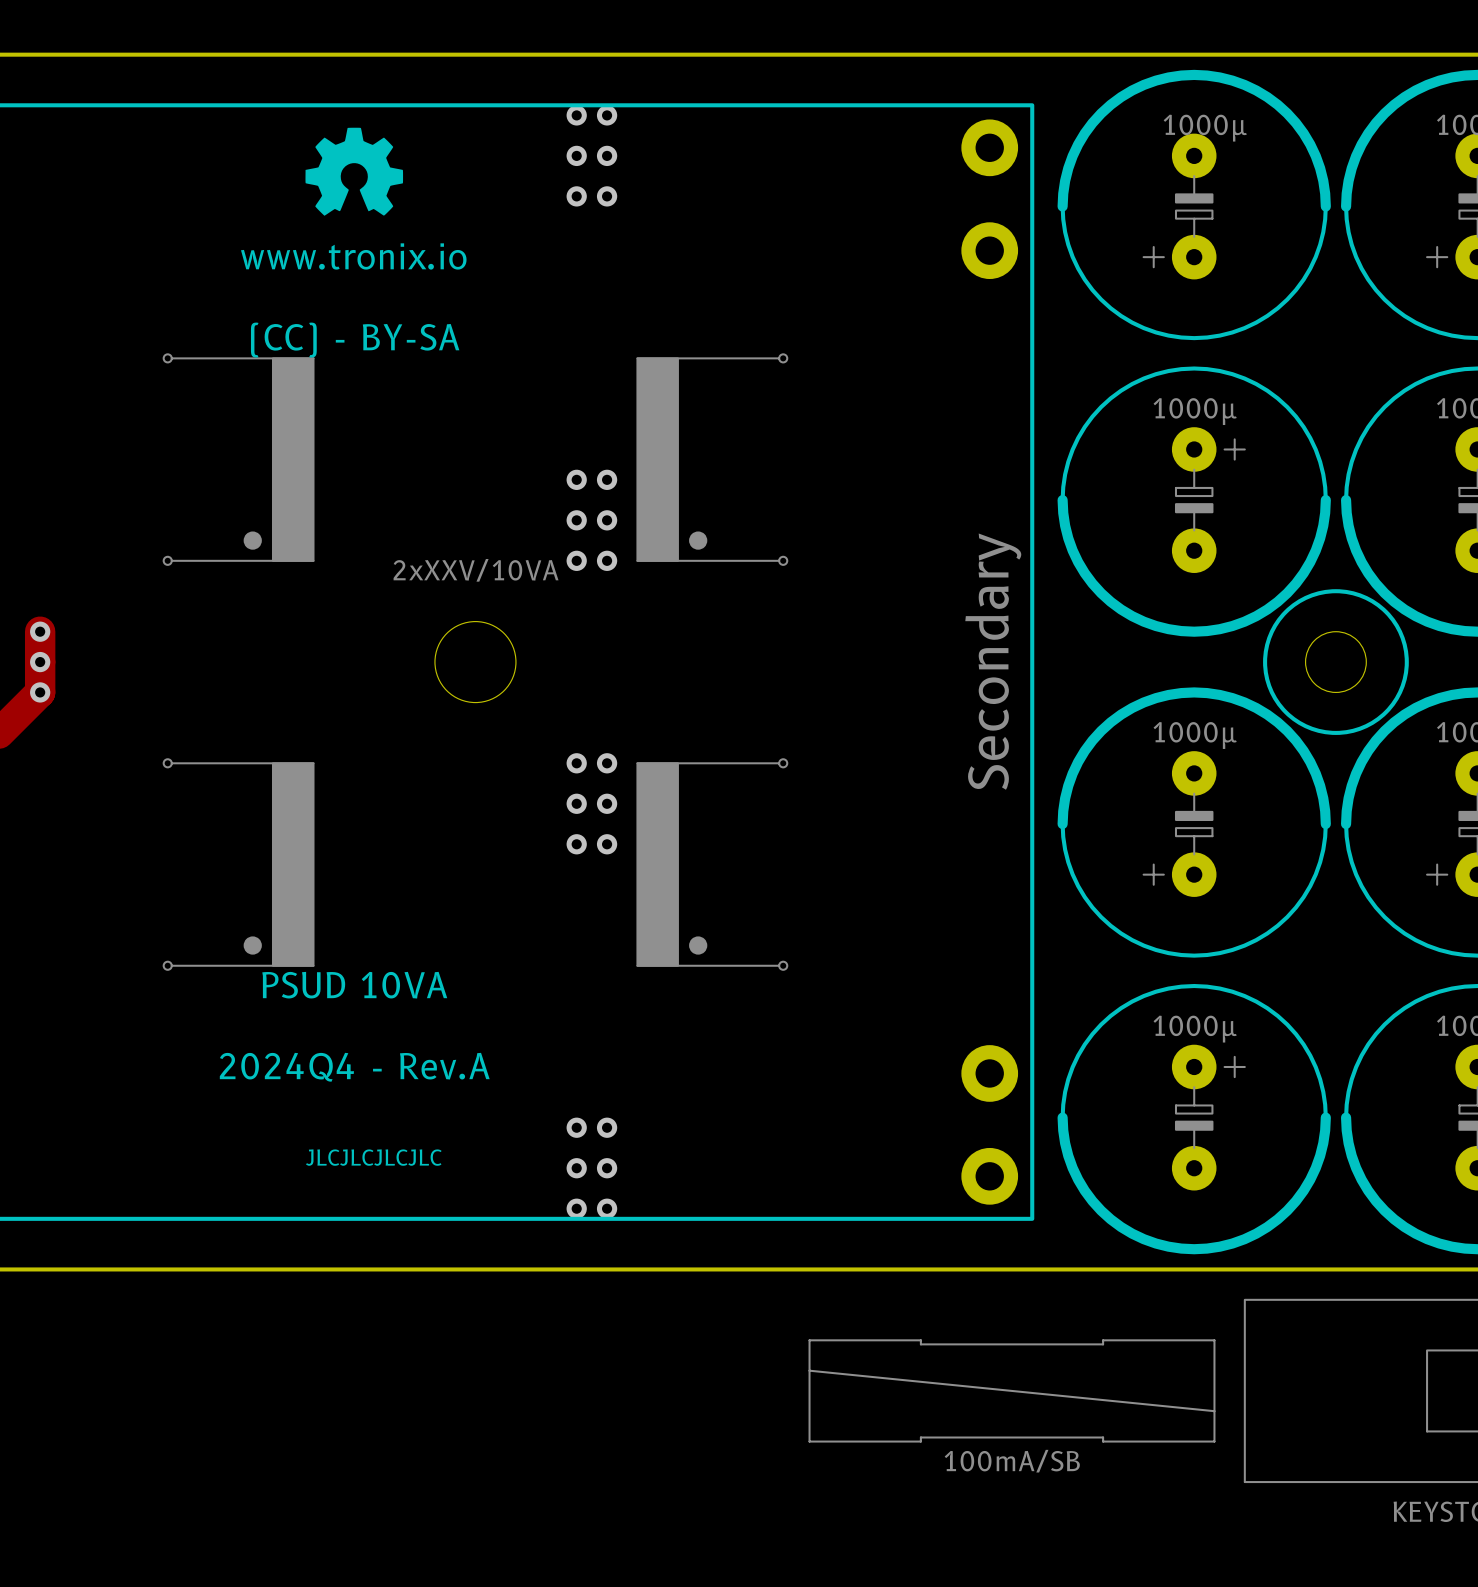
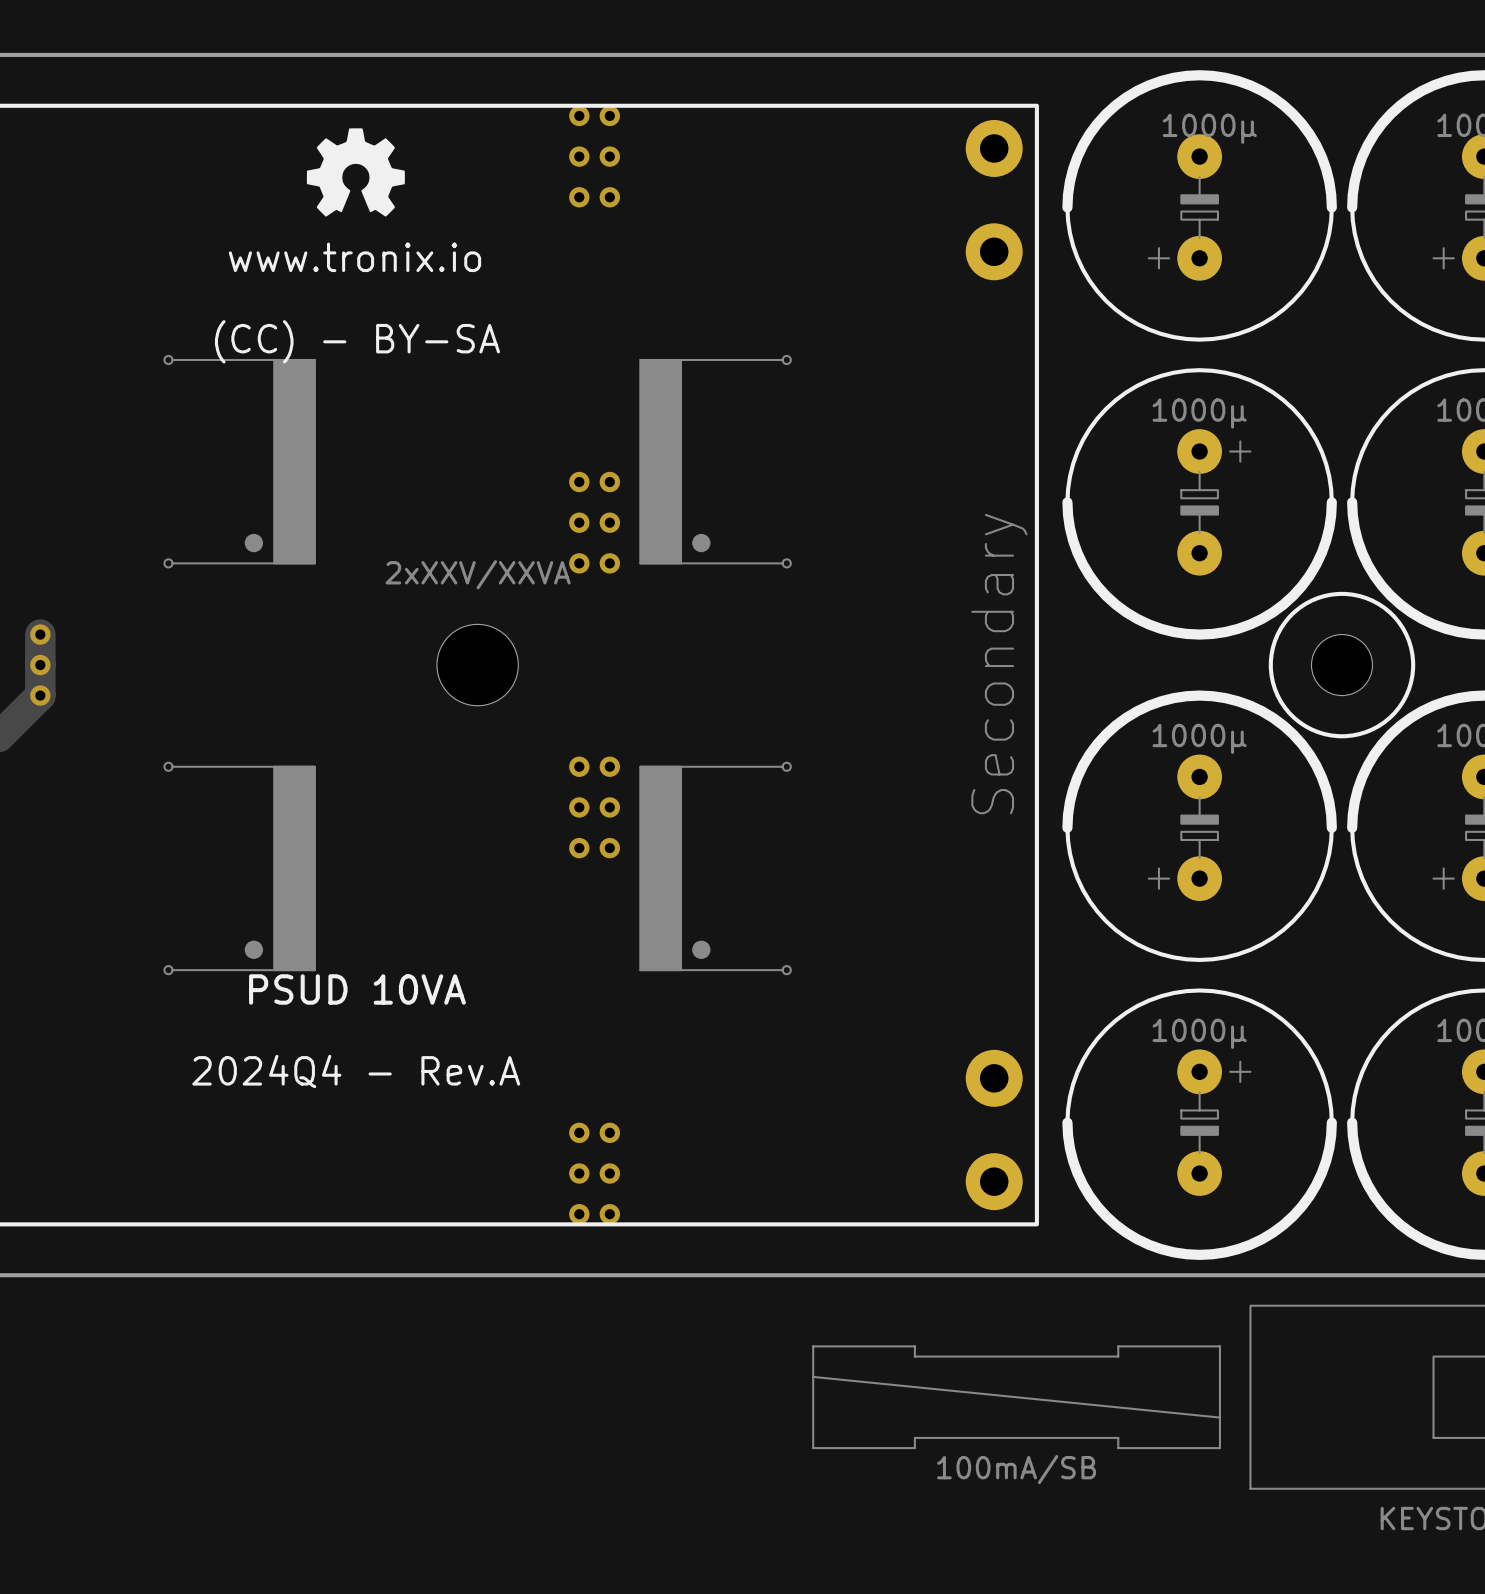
part value: 2xXXV/10VA (476, 570) -> 2xXXV/XXVA (478, 574)
text: JLCJLCJLCJLC (373, 1157) -> none
drawing shape: [808, 1339, 1216, 1473] -> [812, 1345, 1221, 1485]

